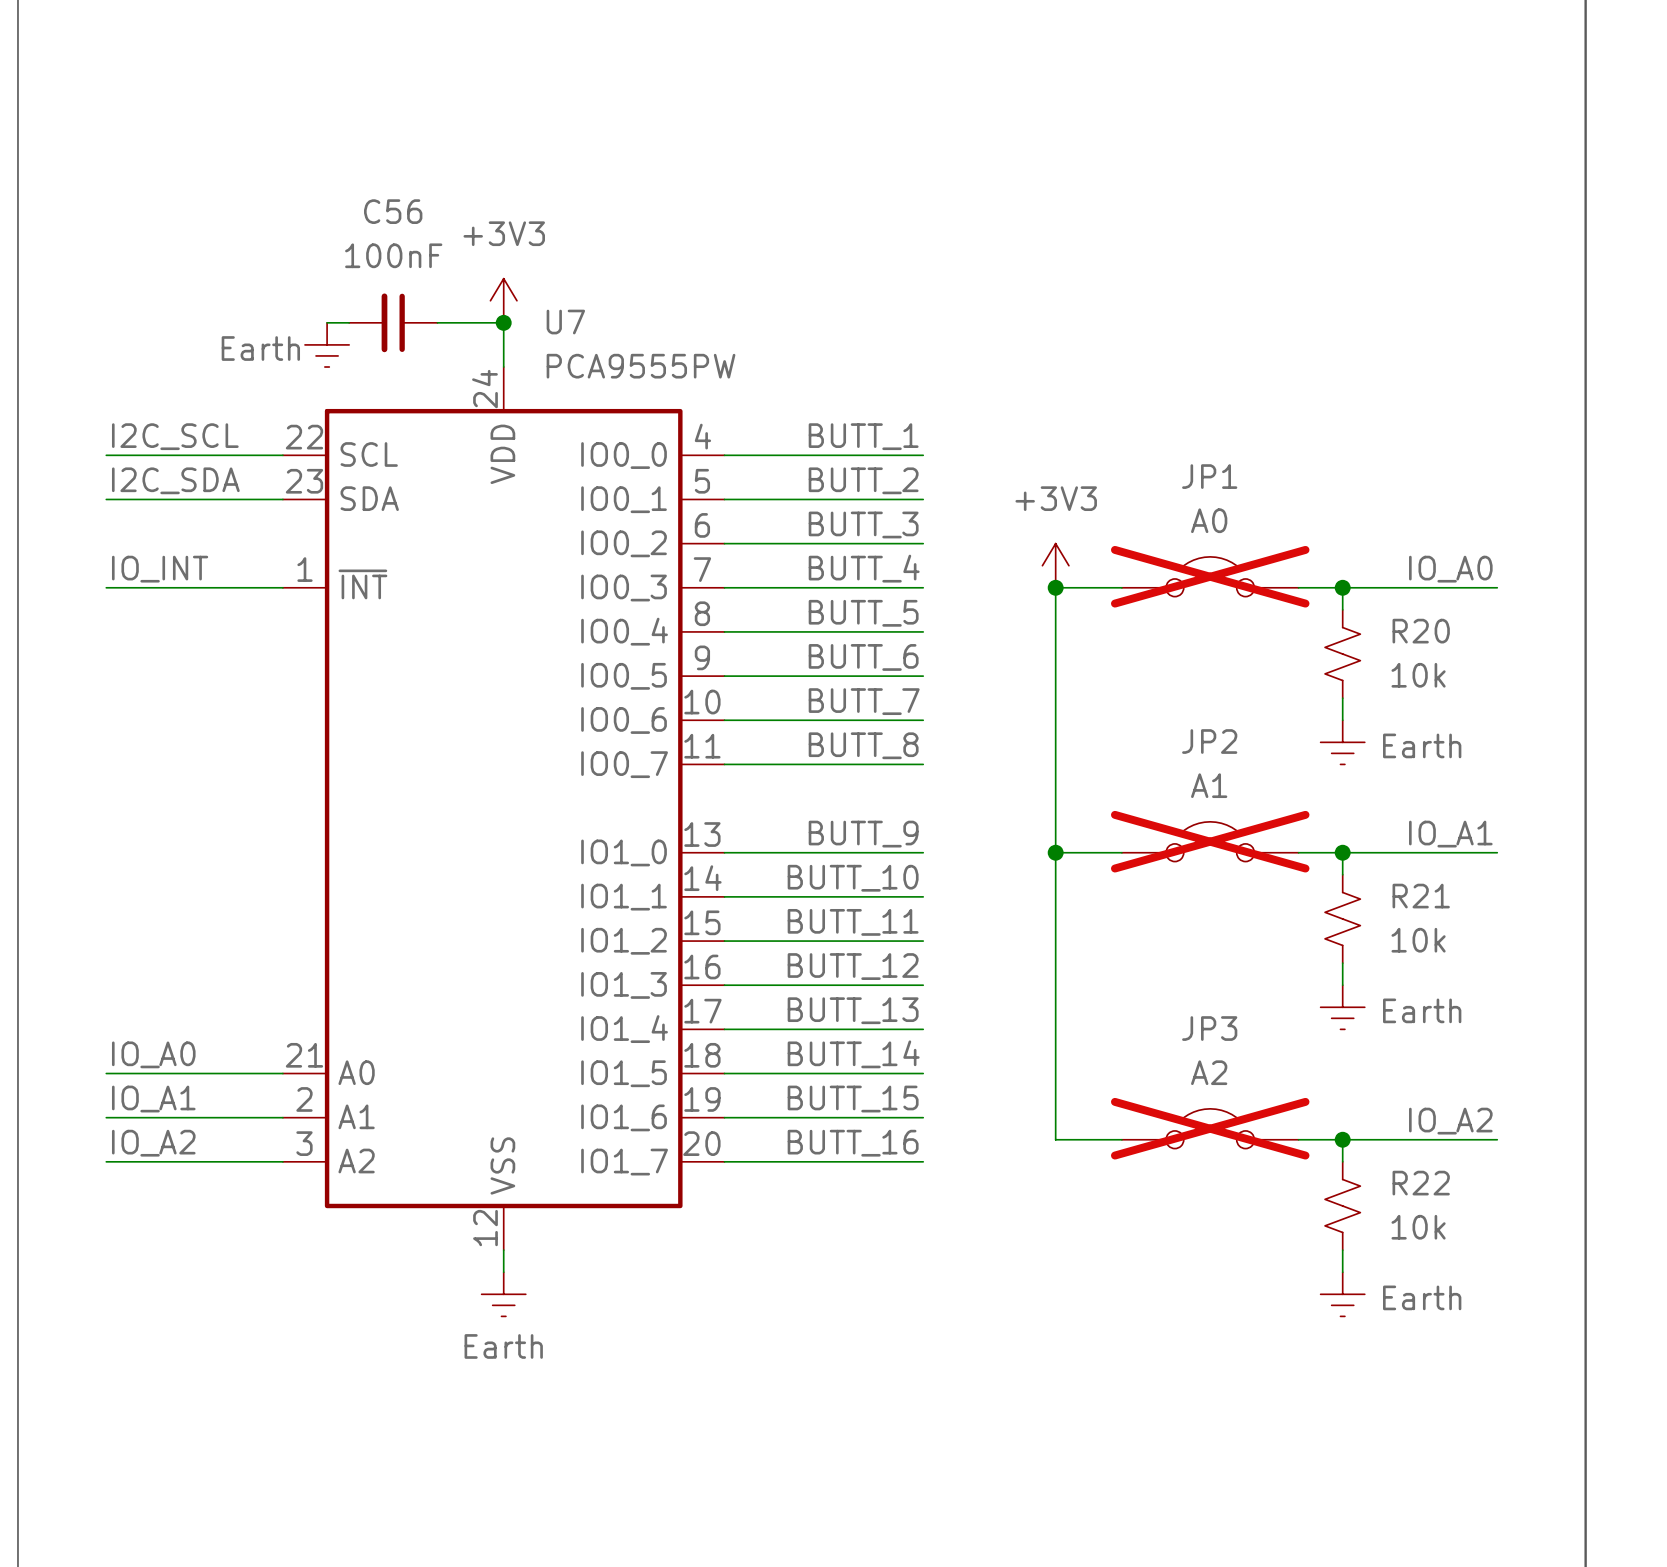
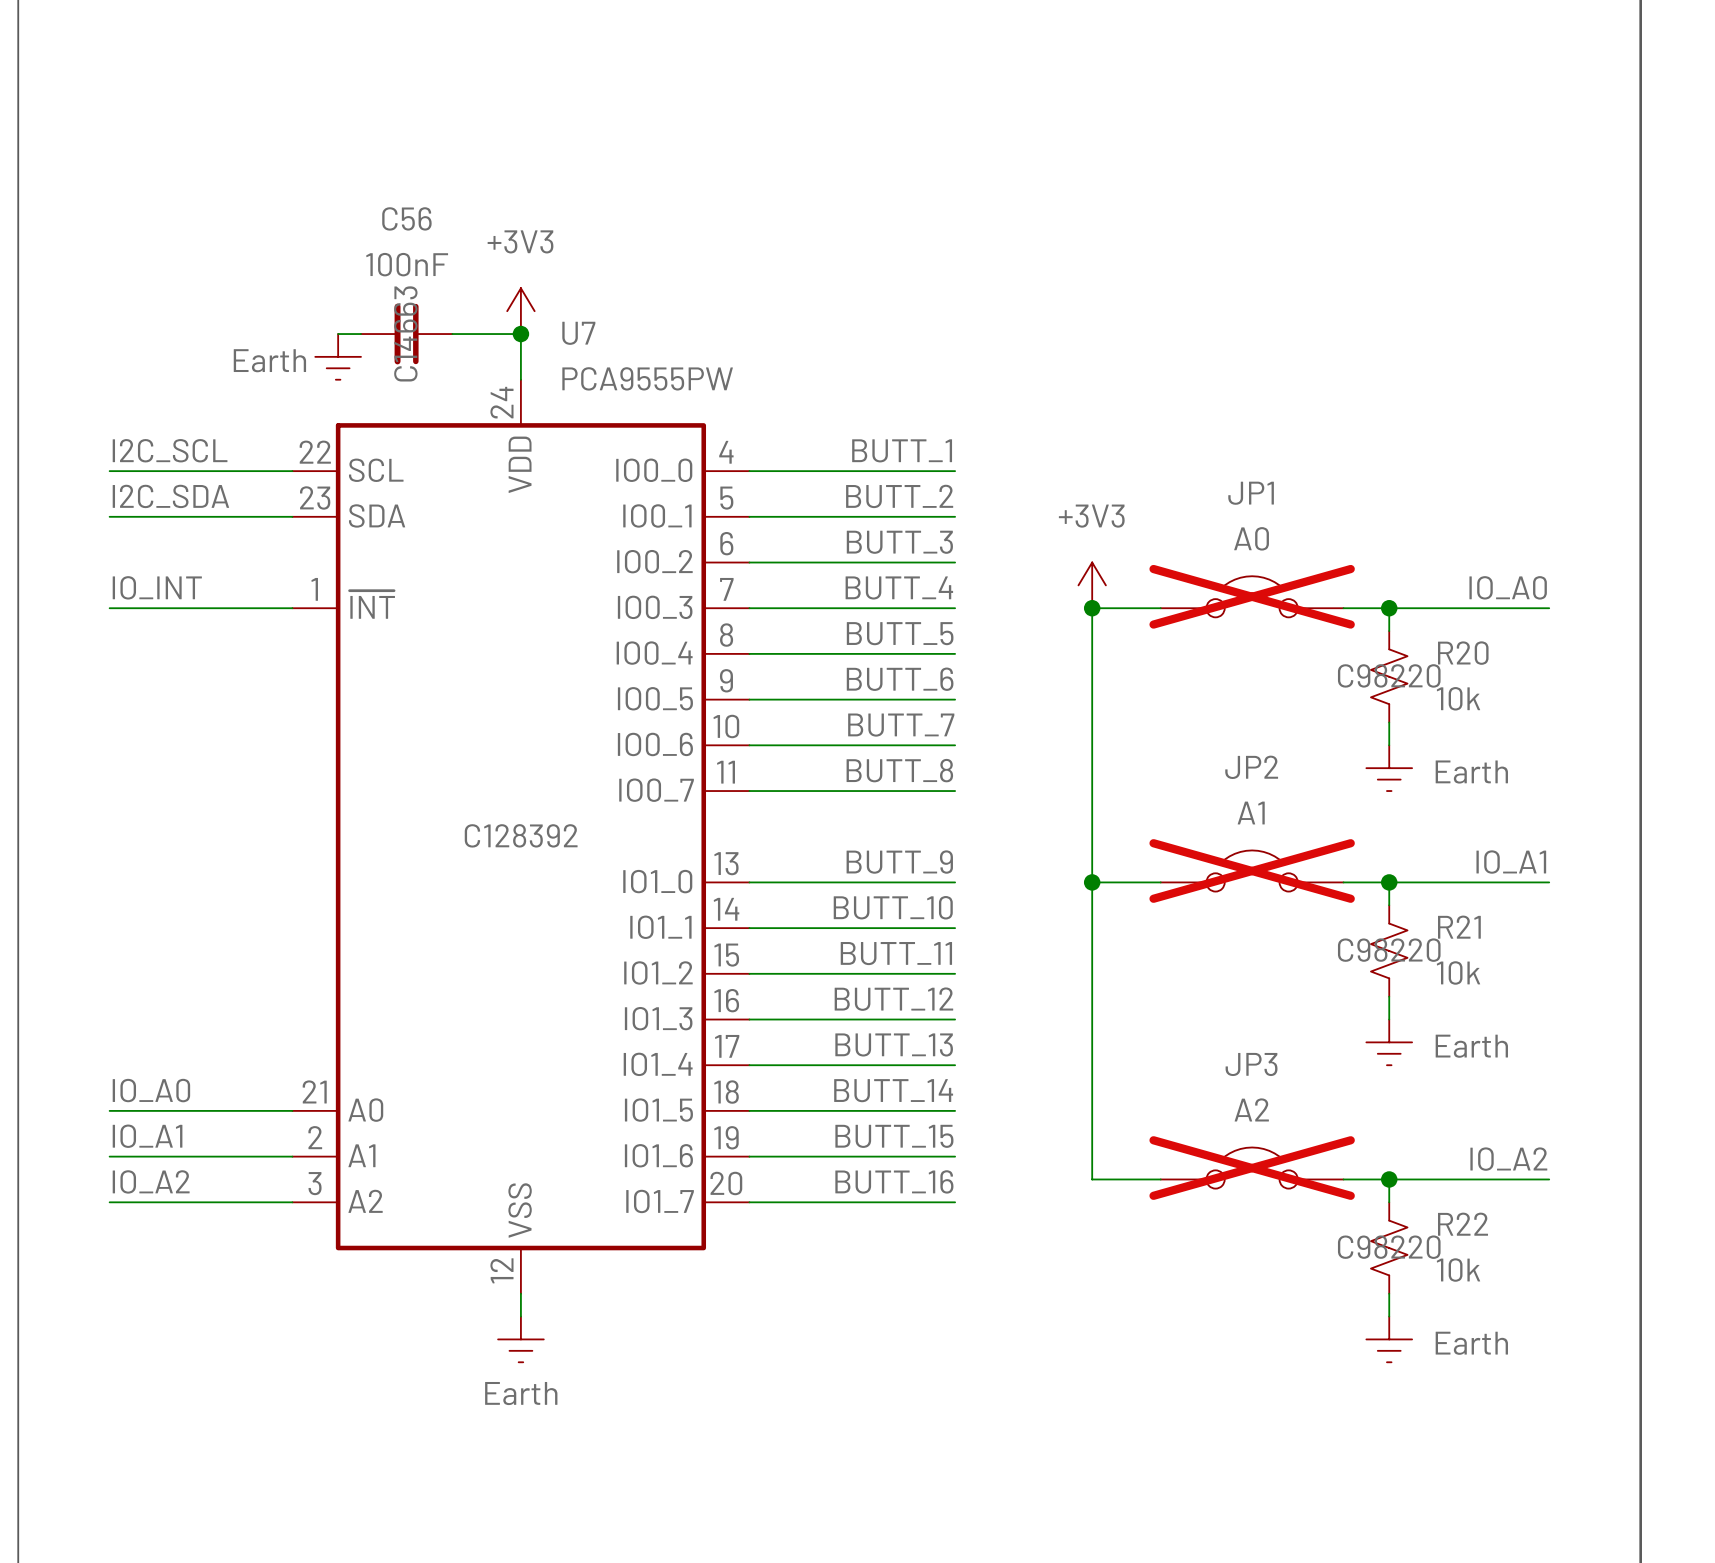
C56 text: none -> C14663 (405, 333)
R20 text: none -> C98220 (1389, 675)
U7 text: none -> C128392 (521, 835)
R21 text: none -> C98220 (1389, 950)
R22 text: none -> C98220 (1389, 1247)

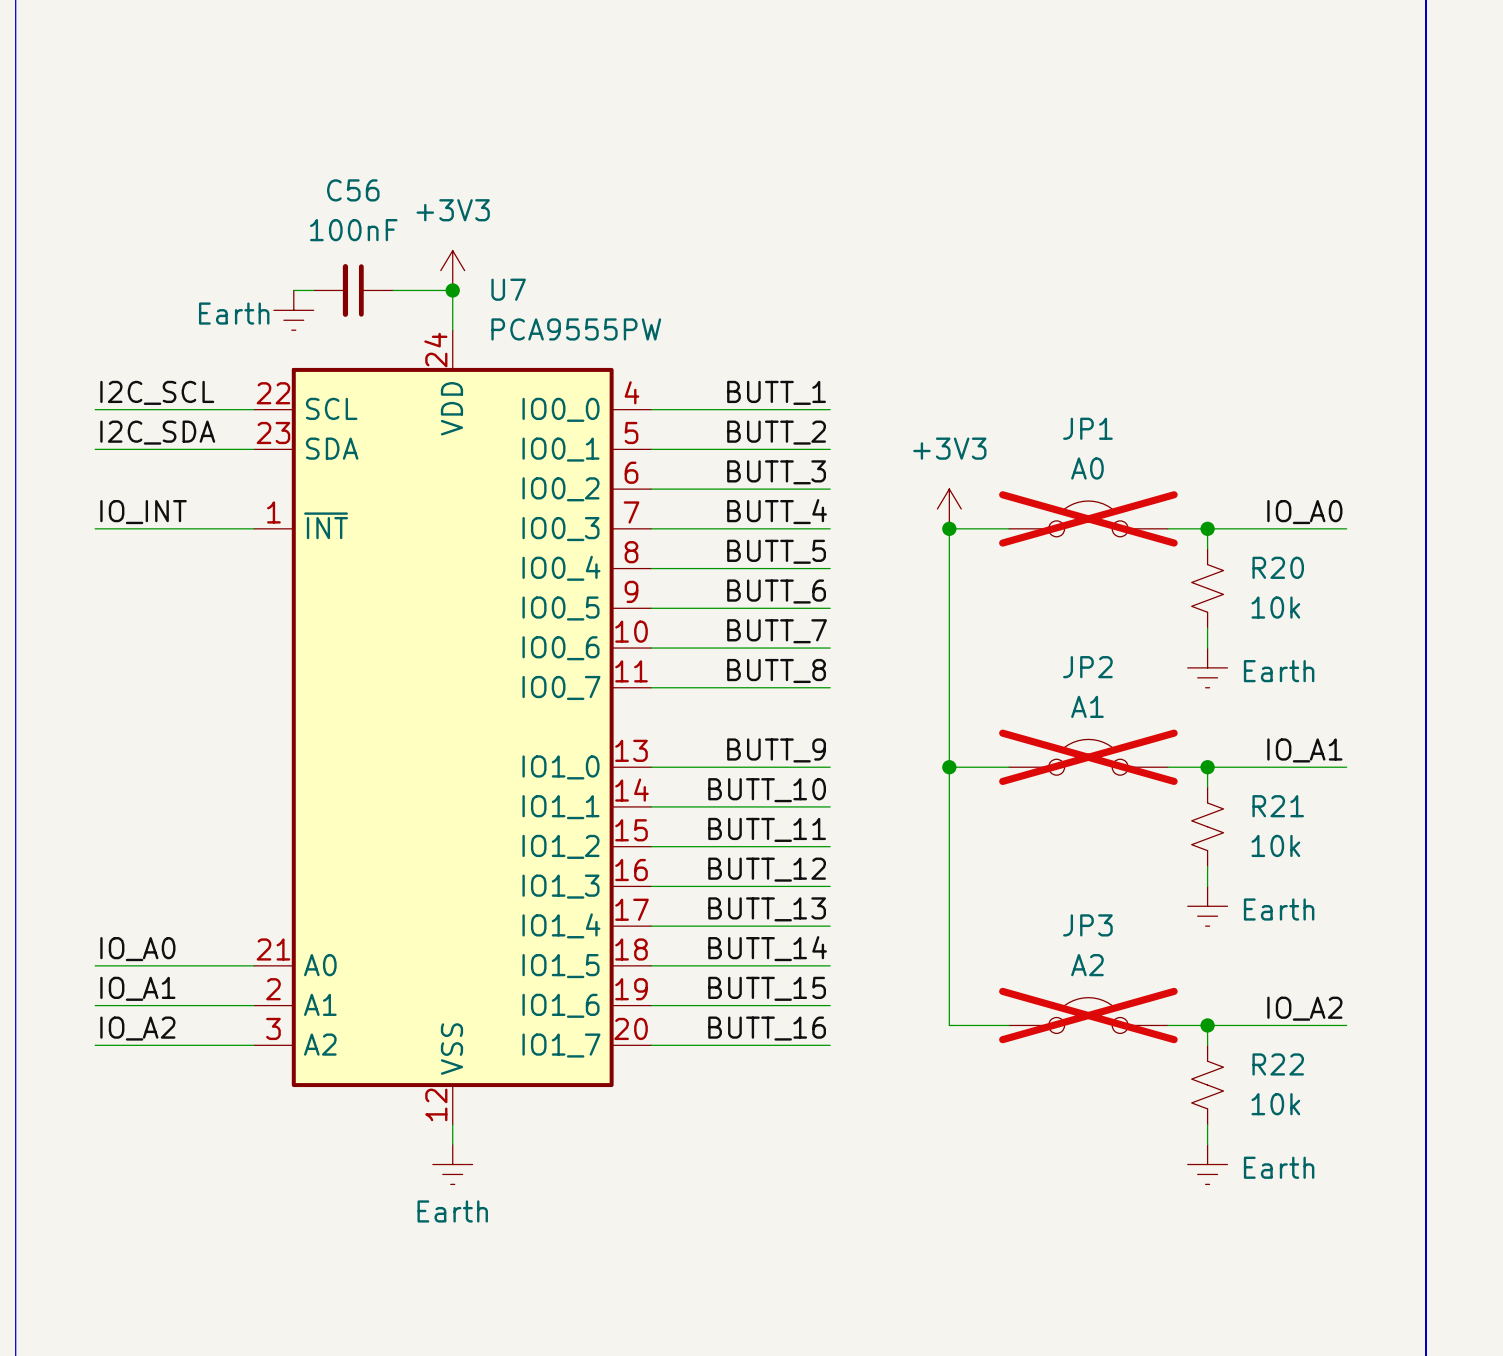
C56 text: C14663 (405, 333) -> none
R20 text: C98220 (1389, 675) -> none
U7 text: C128392 (521, 835) -> none
R21 text: C98220 (1389, 950) -> none
R22 text: C98220 (1389, 1247) -> none

